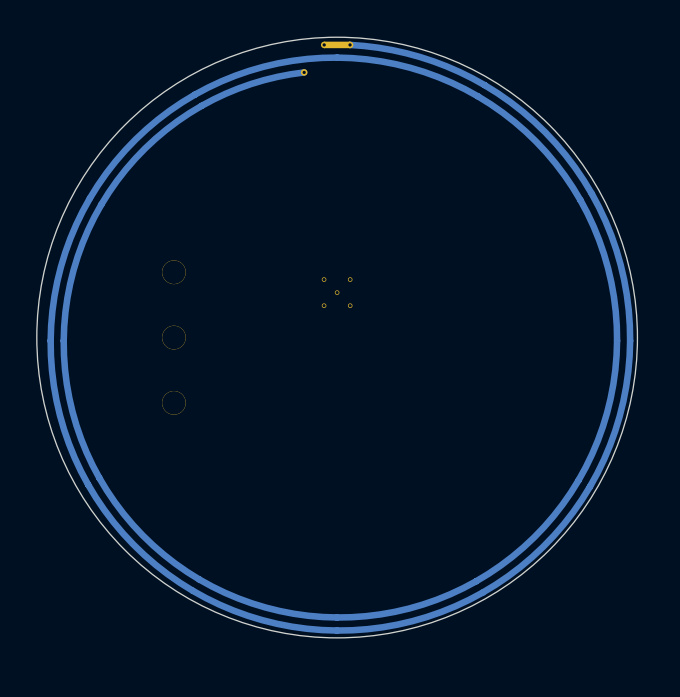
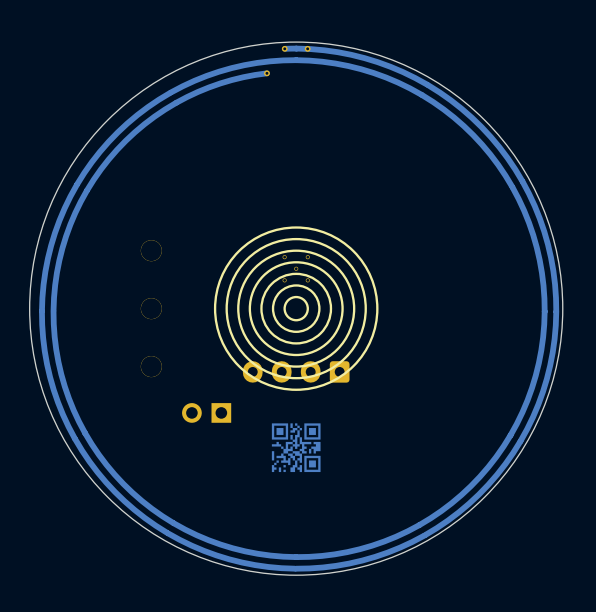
part footprint: [36, 36, 639, 639] -> [29, 41, 564, 576]
drawing: none -> [213, 226, 379, 391]
part: none -> (296, 371)
part: none -> (206, 412)
part: none -> (296, 447)

